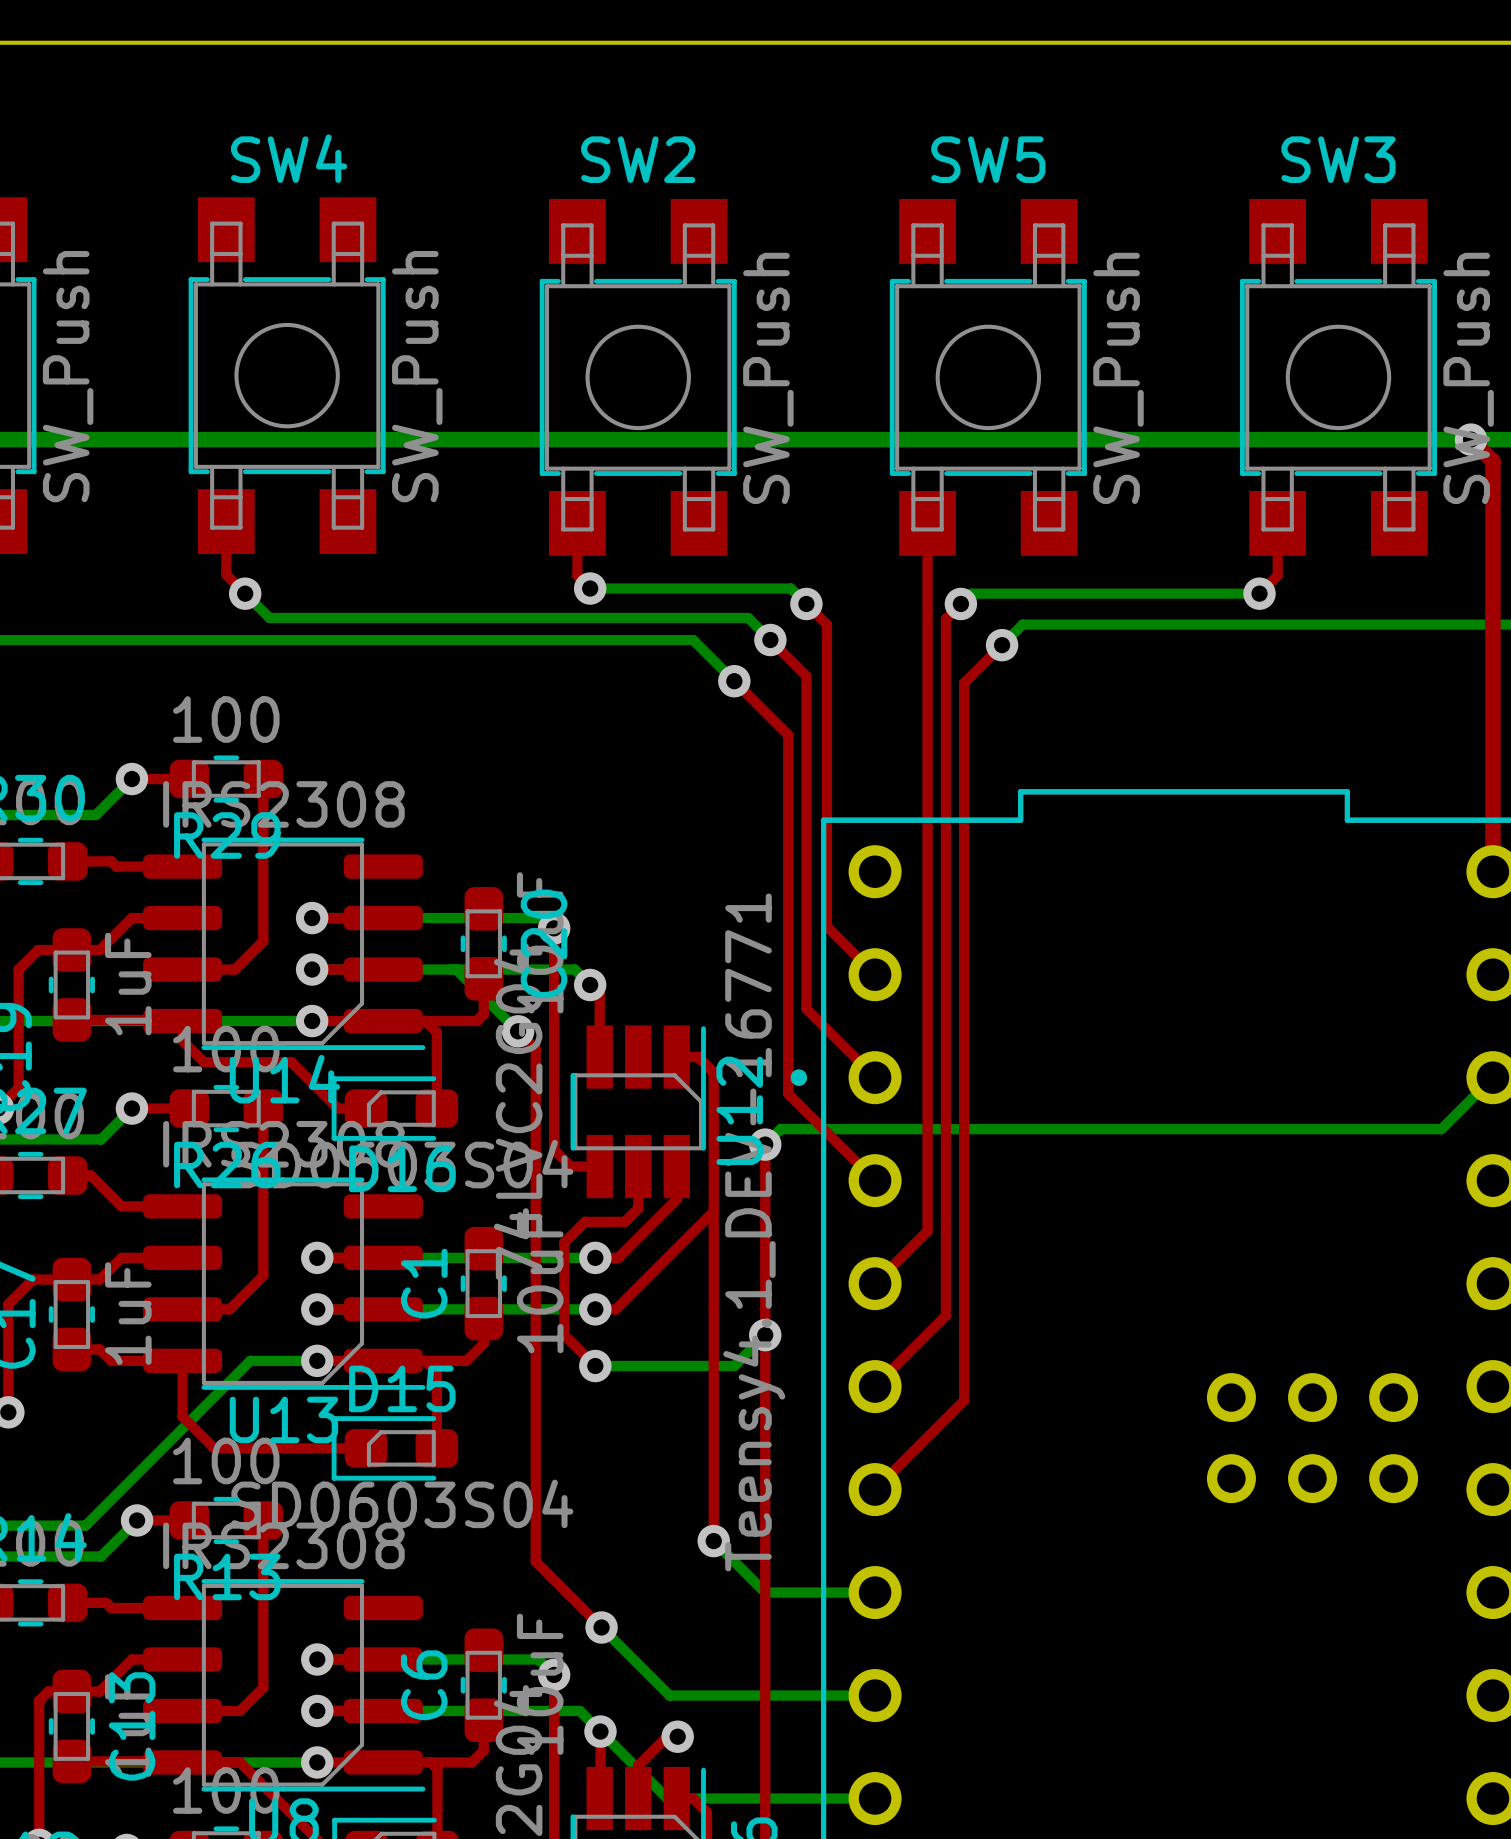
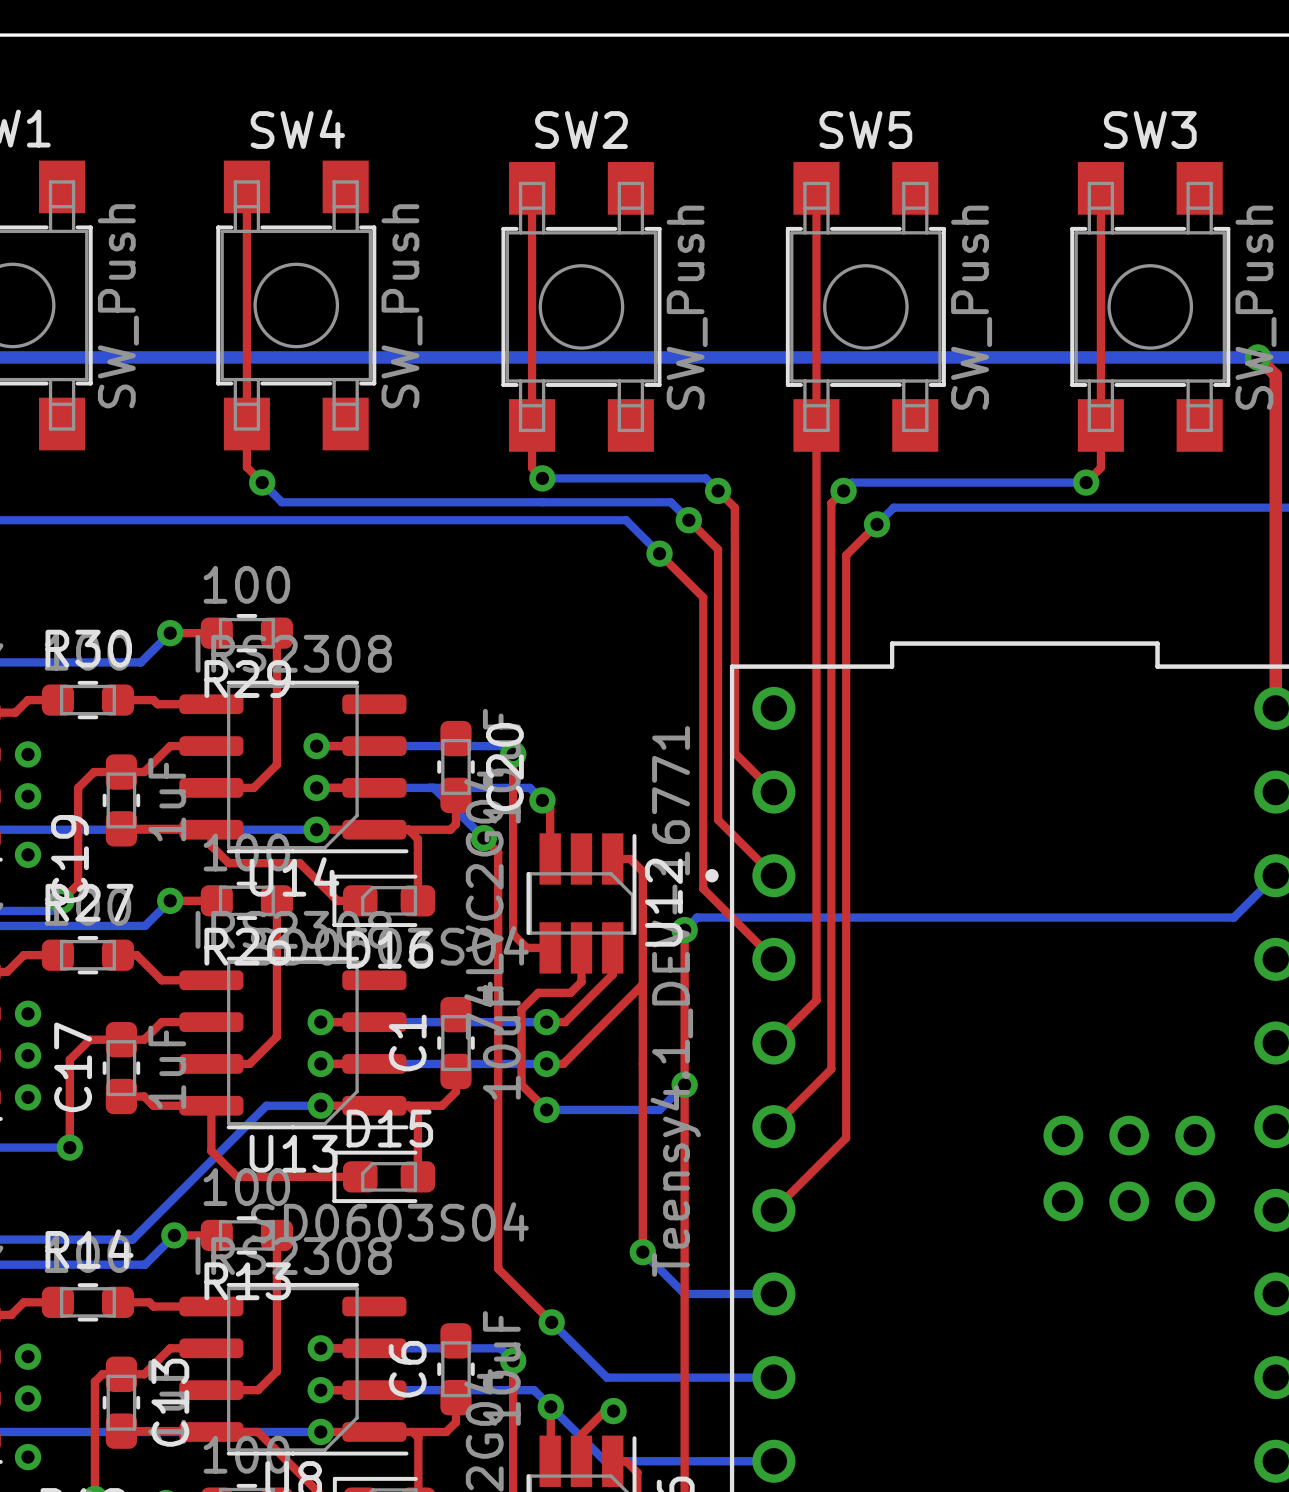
top track: none -> (246, 186) (246, 424)
top track: none -> (532, 188) (532, 425)
top track: none -> (816, 188) (816, 425)
top track: none -> (1100, 188) (1100, 425)

